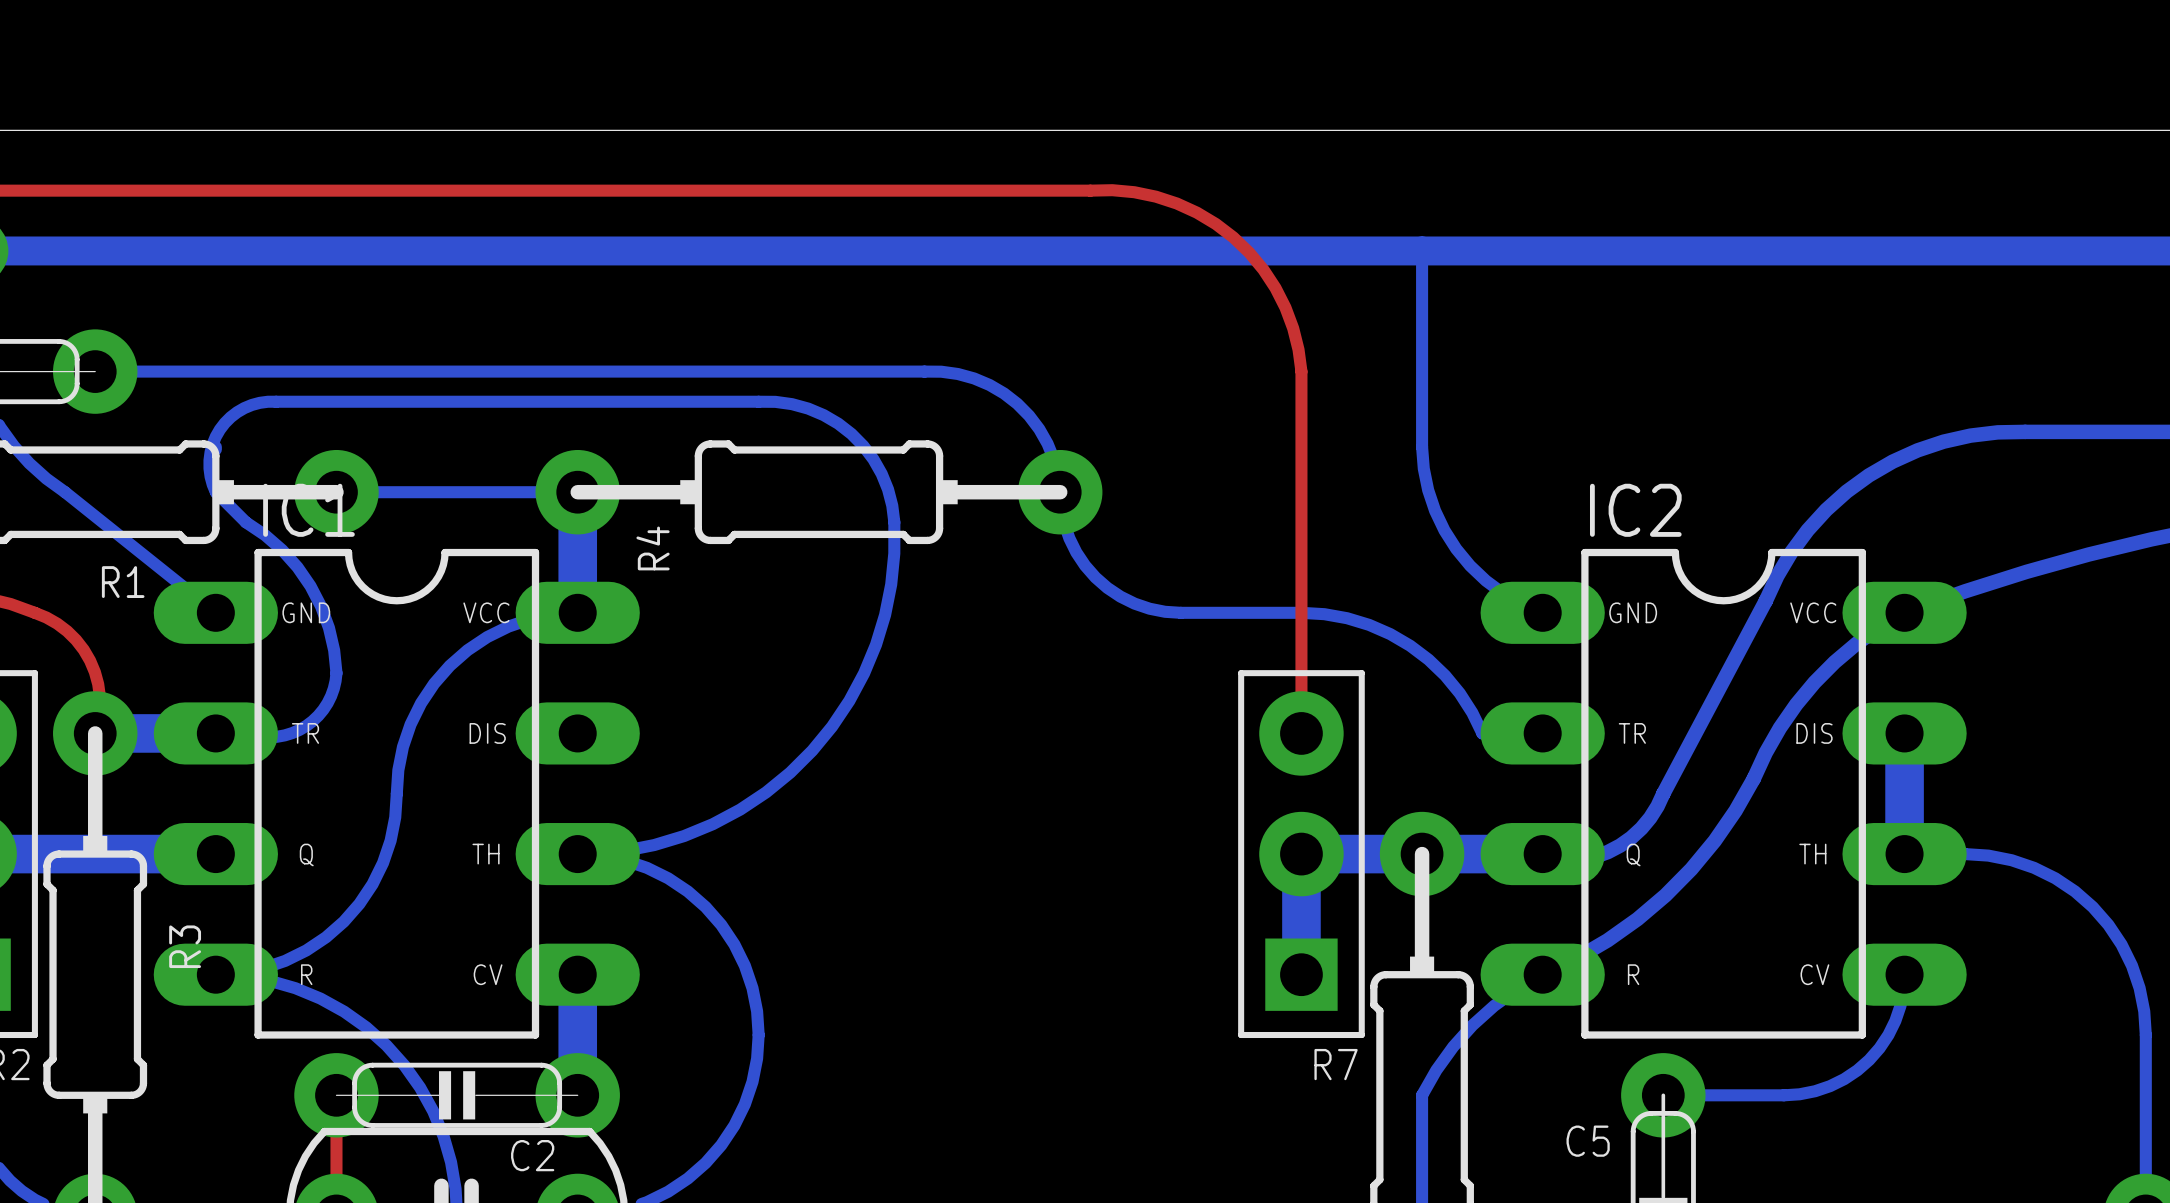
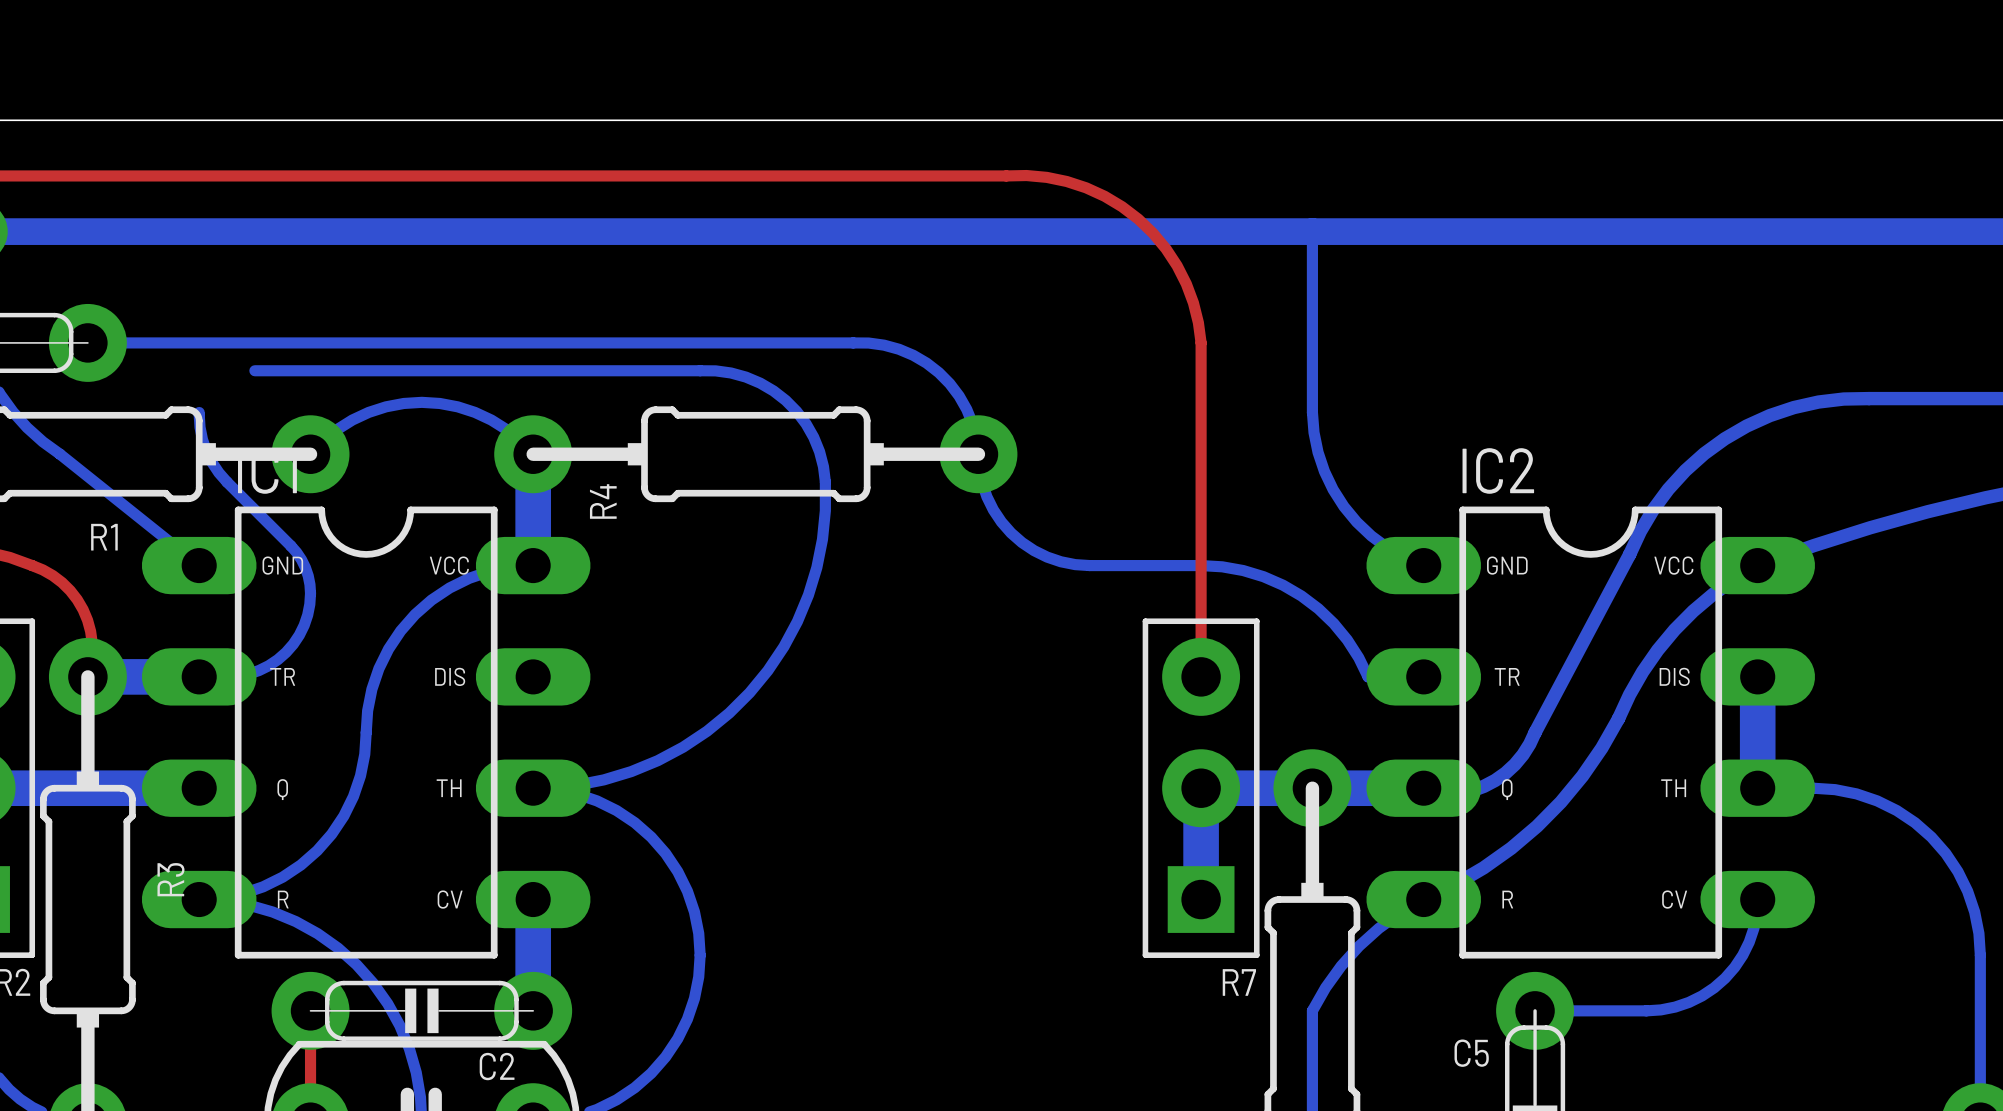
bottom track: (276, 401) (259, 402) (244, 408) (224, 423) (215, 436) (210, 452) (210, 476) (215, 492) (246, 522) (282, 550) (310, 586) (329, 628) (336, 673) (333, 688) (327, 703) (318, 715) (306, 725) (292, 733) (277, 736) (261, 736) (246, 733) -> (199, 414) (202, 439) (211, 462) (227, 482) (296, 552) (305, 567) (309, 584) (309, 604) (304, 625) (286, 652) (258, 670) (227, 676)
bottom track: (336, 492) (577, 492) -> (310, 454) (337, 429) (368, 412) (403, 403) (421, 402) (439, 403) (474, 412) (506, 429) (533, 454)

